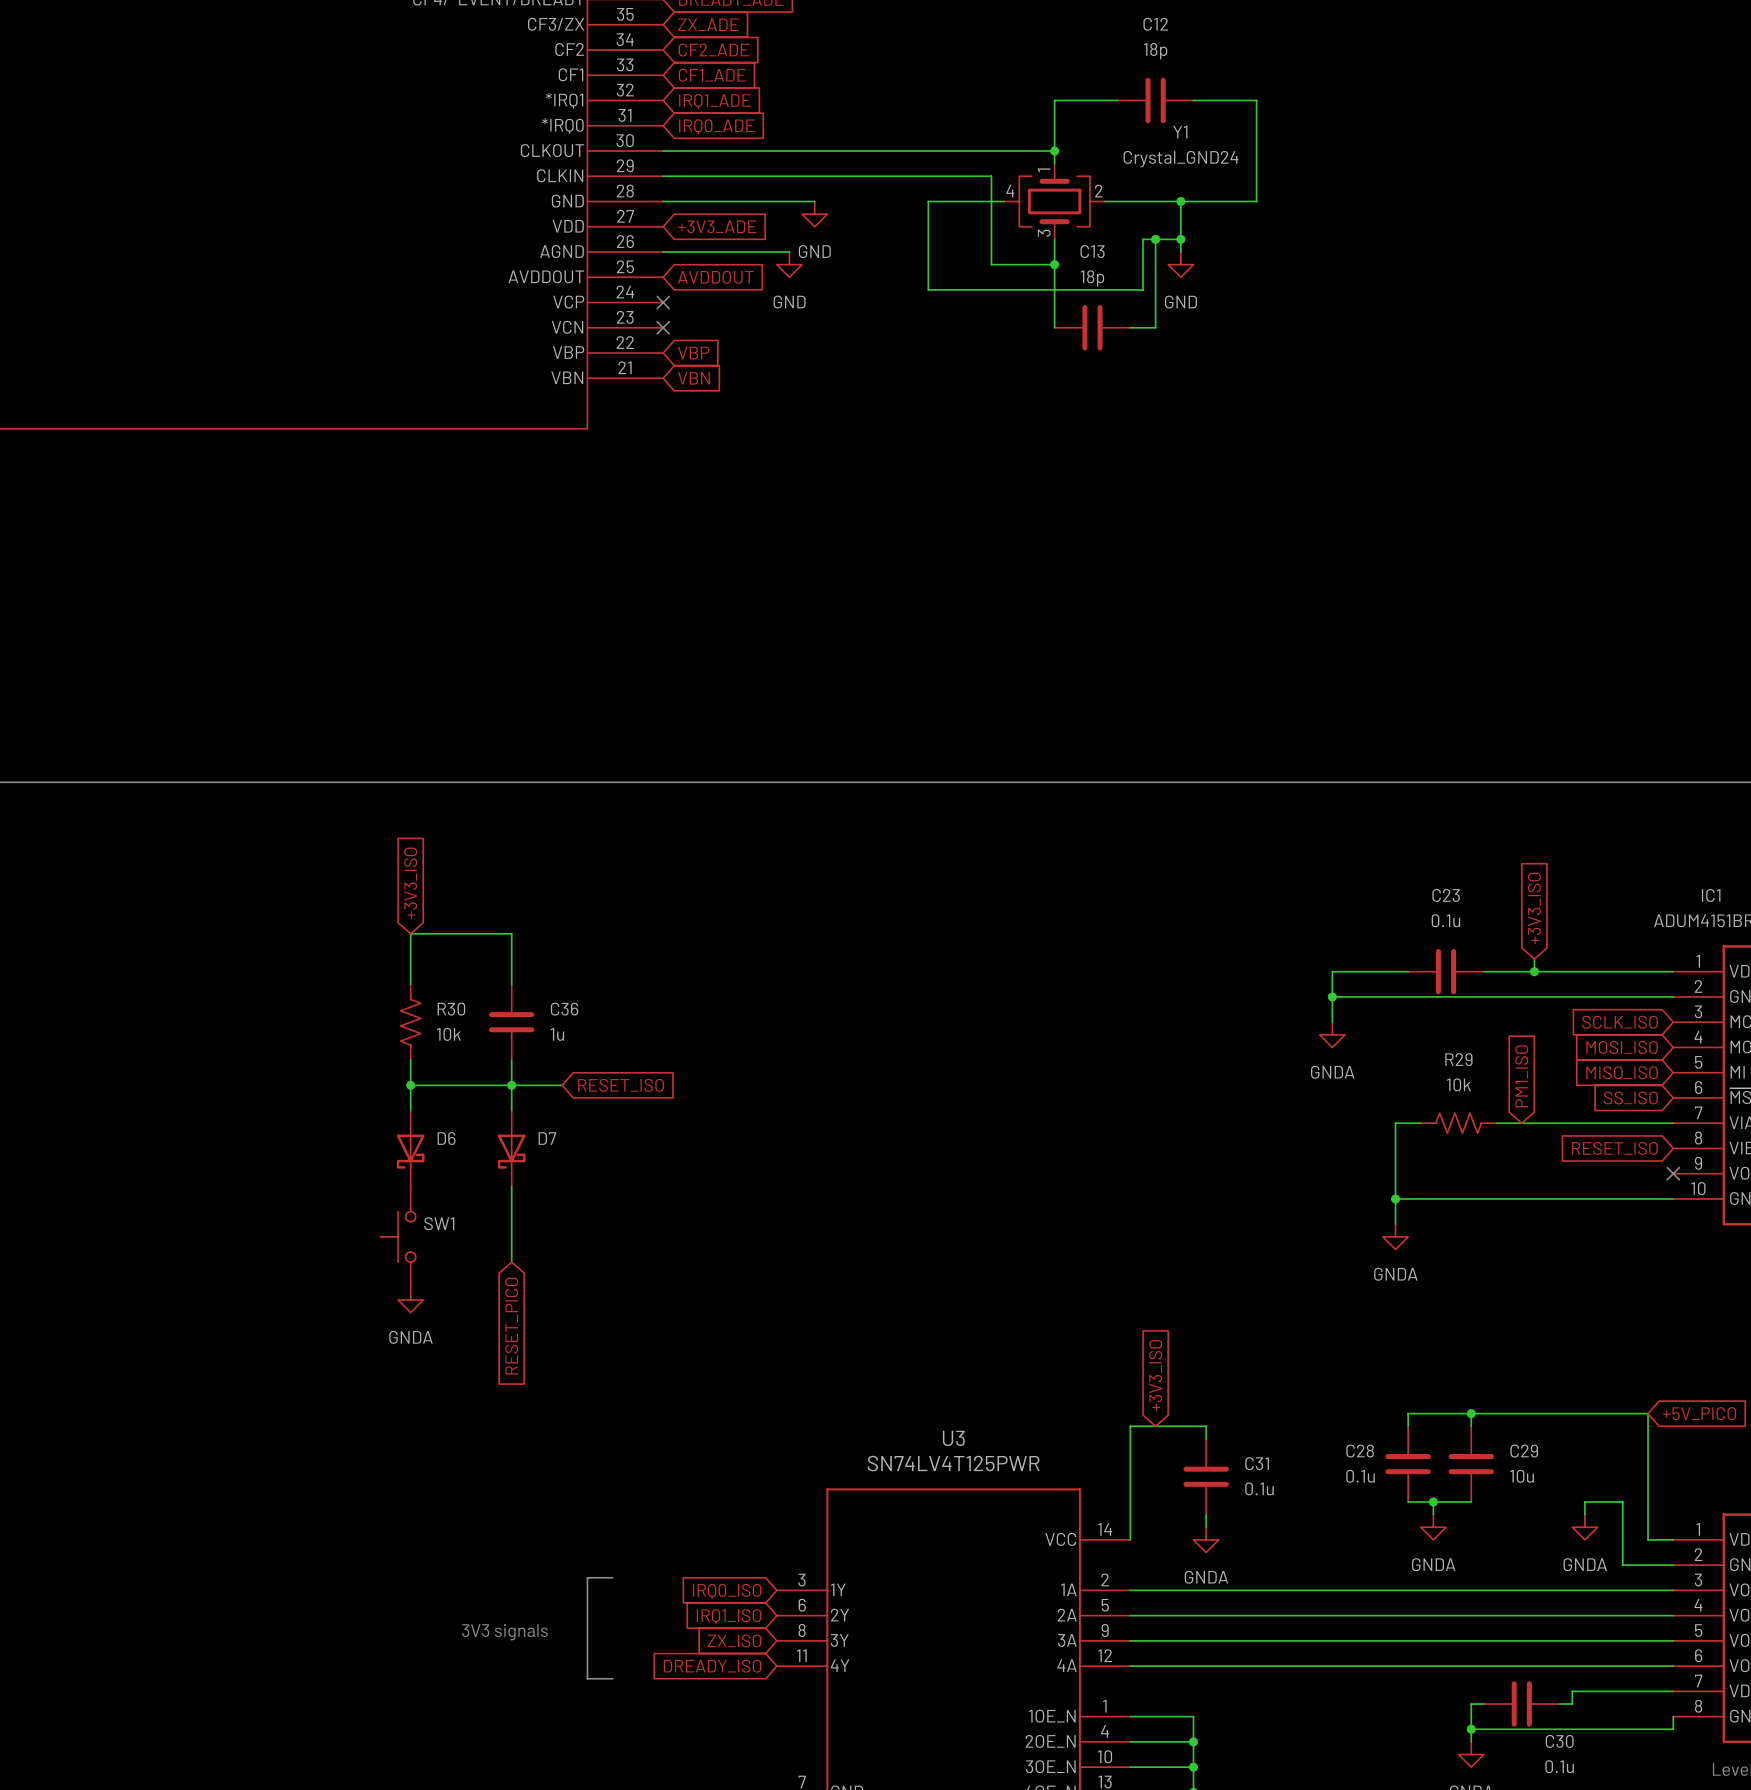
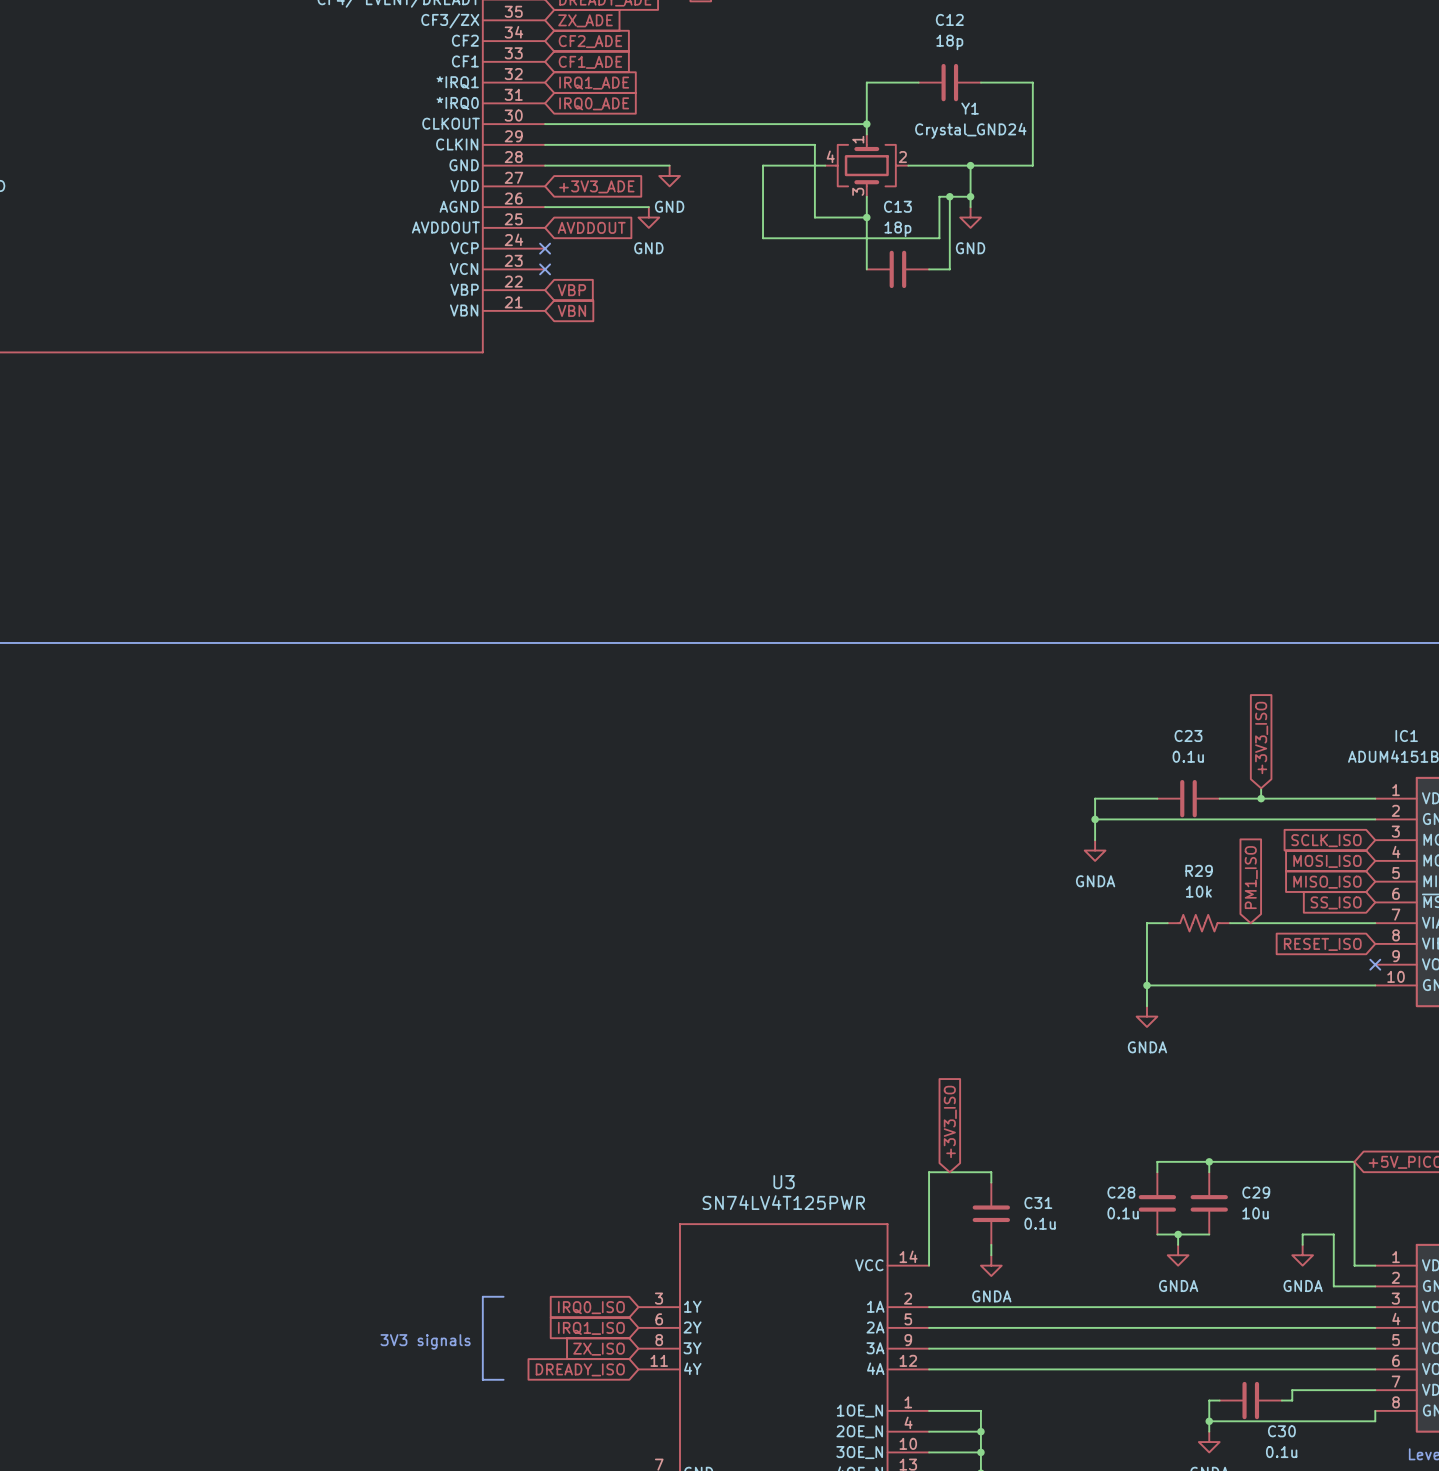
global label: +3V3_ISO (410, 883) -> none
wire: (410, 984) (410, 933) (511, 933) (511, 984) -> none
R30: 10k (410, 1022) -> none
C36: 1u (511, 1022) -> none
wire: (410, 1060) (410, 1110) -> none
wire: (511, 1060) (511, 1110) -> none
wire: (410, 1085) (562, 1085) -> none
junction: (410, 1085) -> none
junction: (511, 1085) -> none
global label: RESET_ISO (621, 1085) -> none
D6: (410, 1148) -> none
D7: (511, 1148) -> none
wire: (511, 1186) (511, 1262) -> none
SW1: (398, 1236) -> none
power symbol: GNDA (410, 1299) -> none
global label: RESET_PICO (511, 1326) -> none

